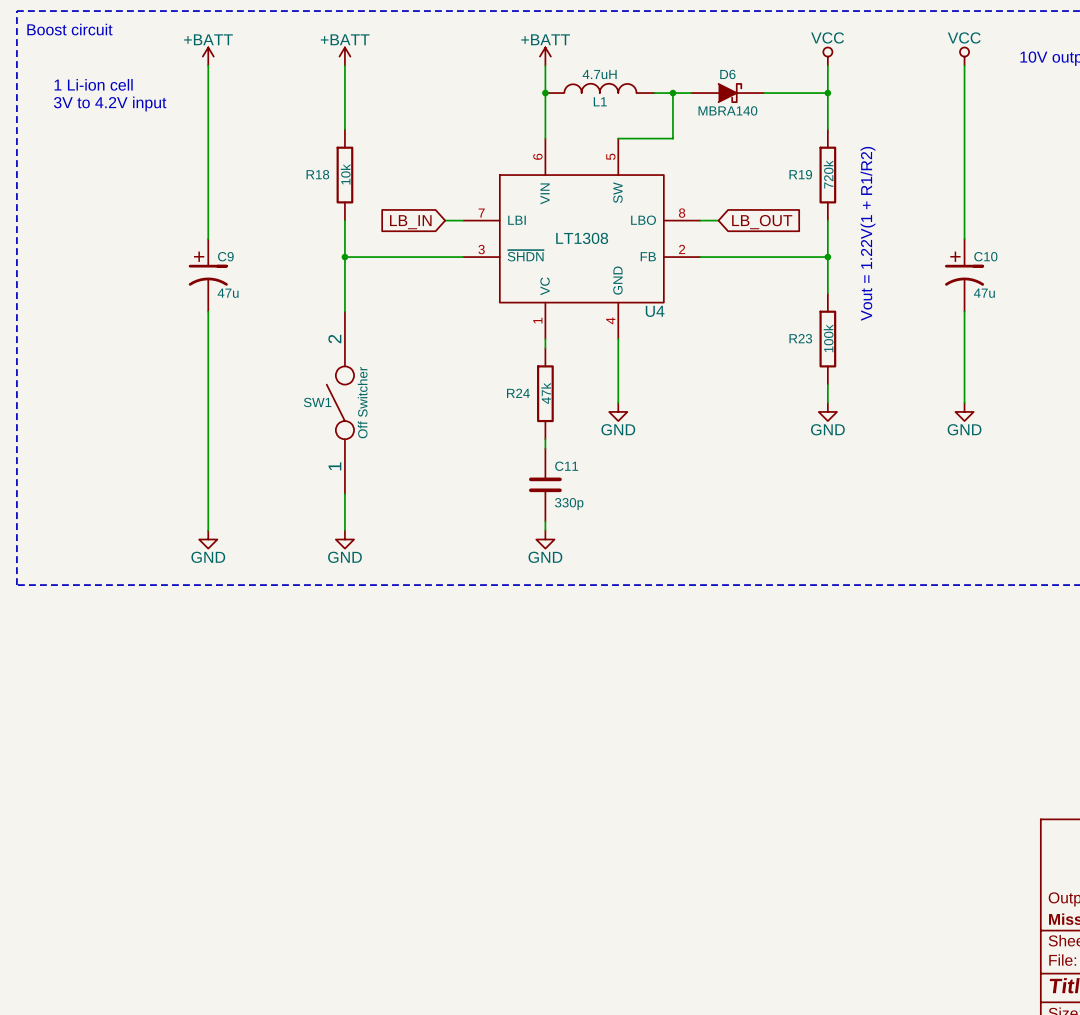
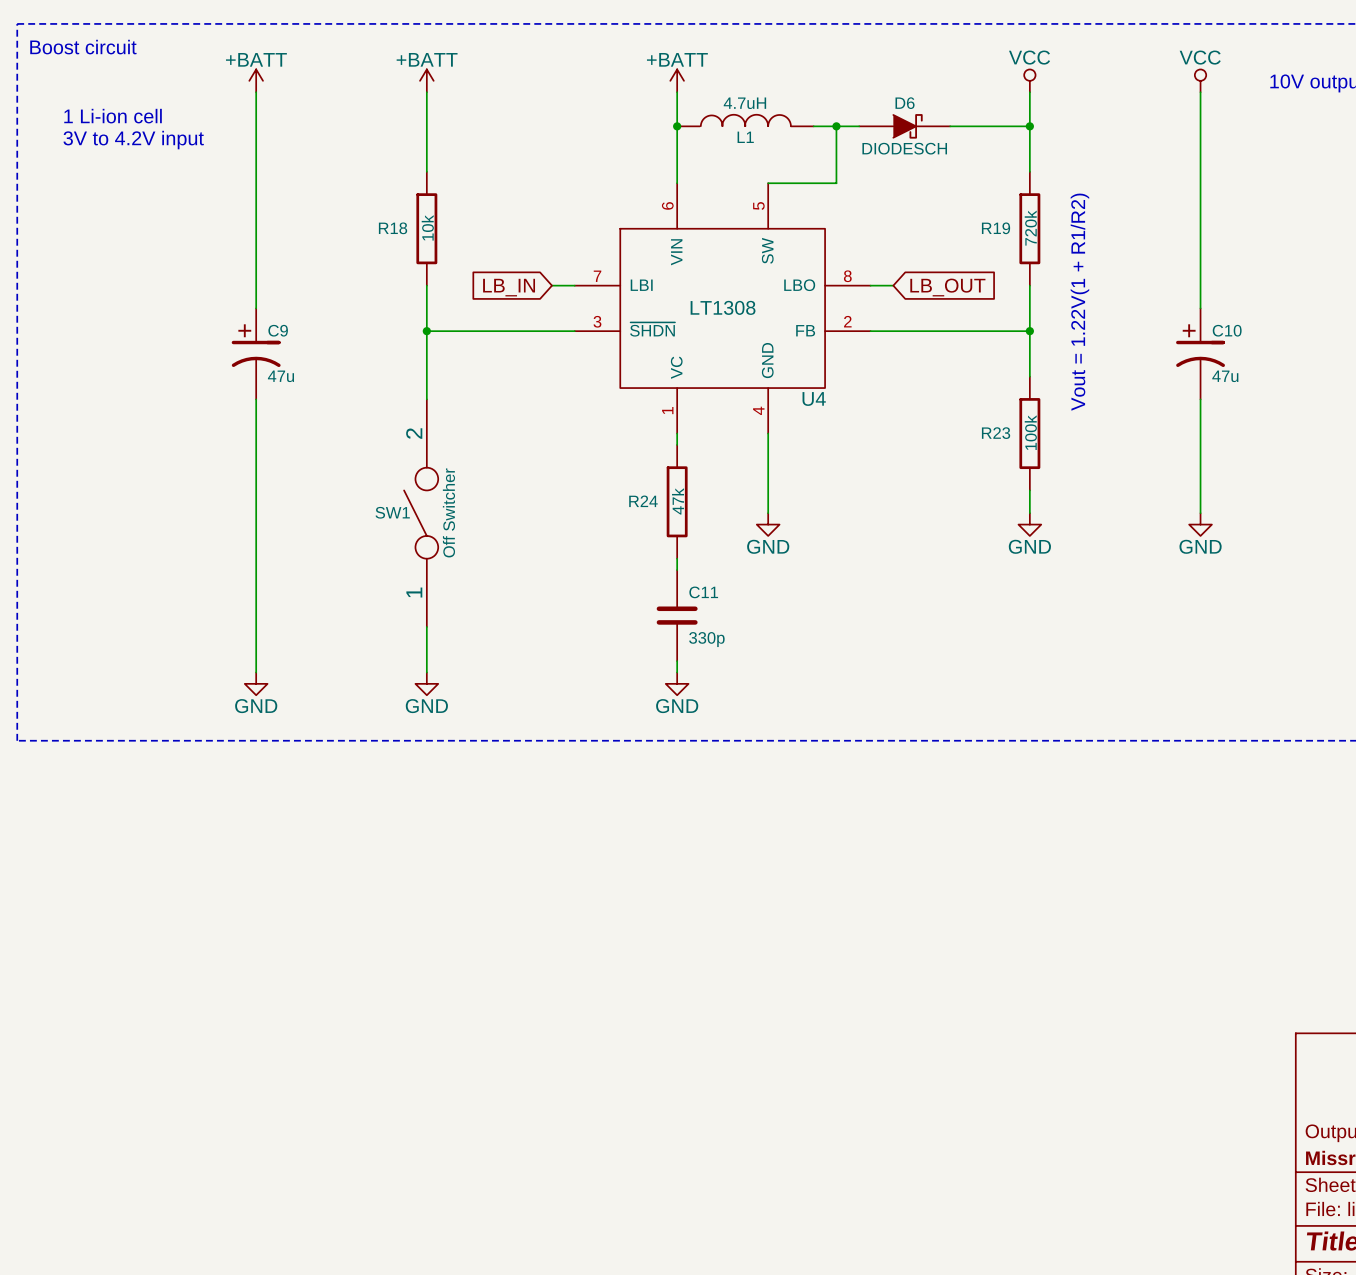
D6 value: MBRA140 (727, 110) -> DIODESCH (904, 148)

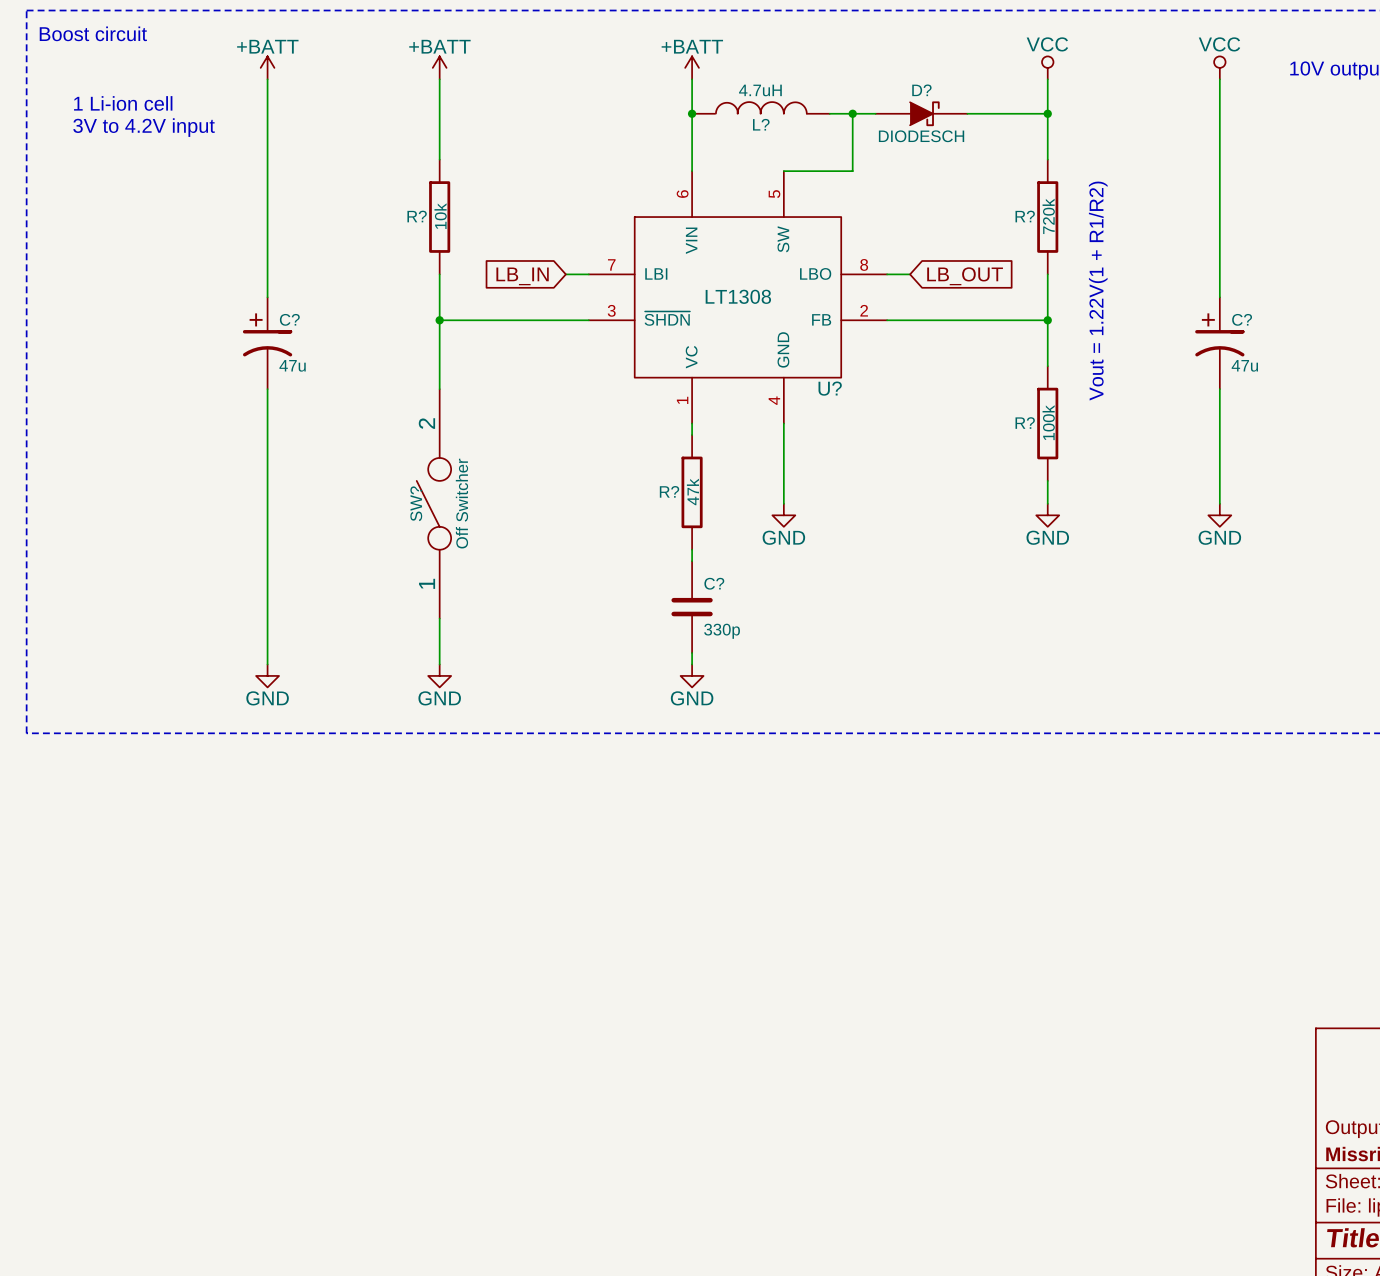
D6 name: D6 (905, 103) -> D? (921, 90)
L1 name: L1 (745, 137) -> L? (761, 124)
R18 name: R18 (393, 228) -> R? (417, 216)
R19 name: R19 (996, 228) -> R? (1025, 216)
C9 name: C9 (278, 330) -> C? (289, 319)
C10 name: C10 (1227, 330) -> C? (1242, 319)
U4 name: U4 (814, 399) -> U? (830, 388)
R23 name: R23 (996, 433) -> R? (1025, 423)
R24 name: R24 (643, 501) -> R? (669, 491)
SW1 name: SW1 (392, 512) -> SW? (416, 503)
C11 name: C11 (703, 592) -> C? (714, 583)

